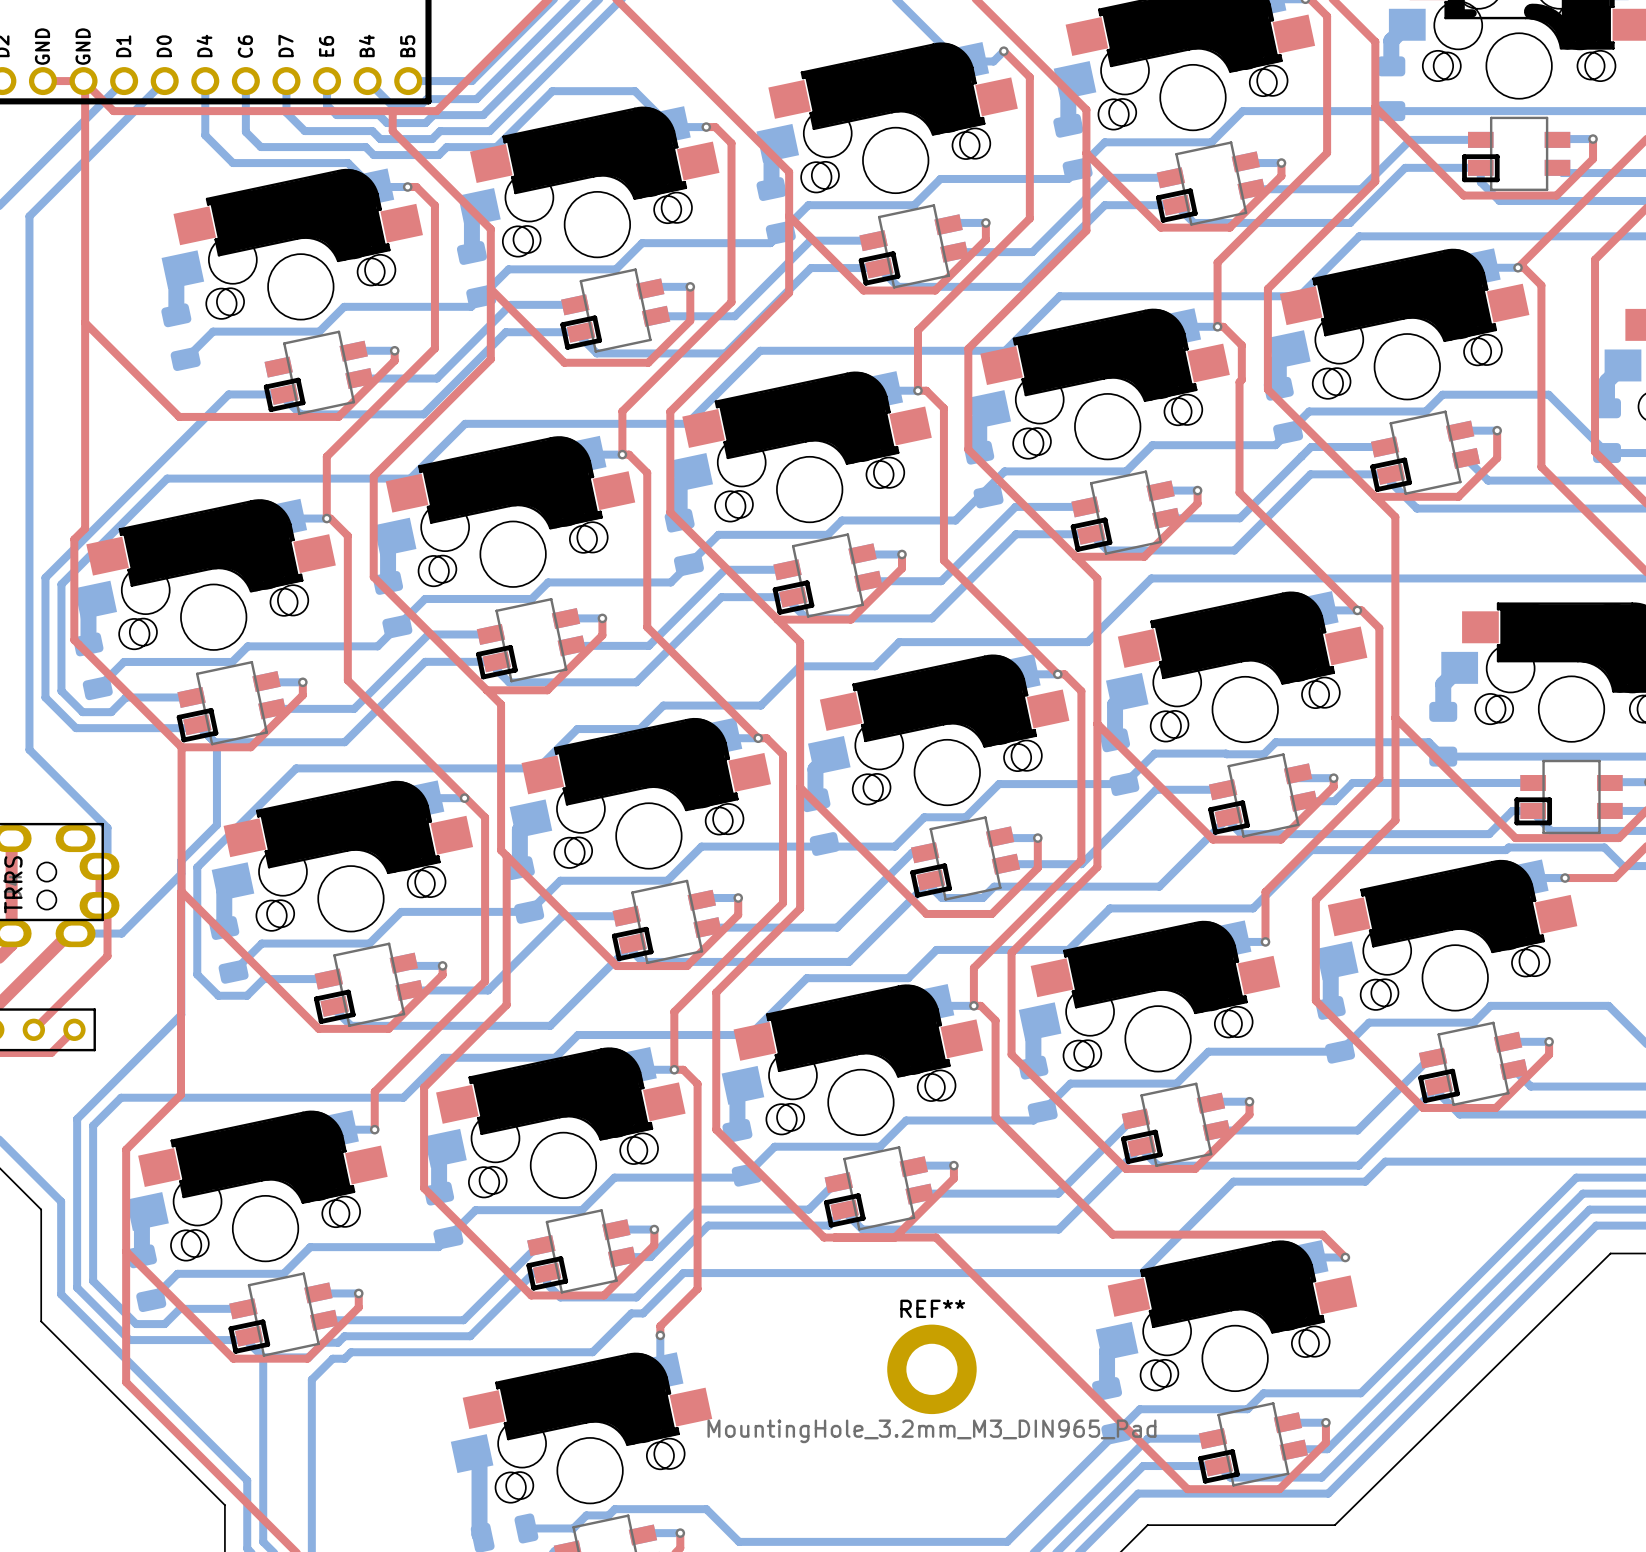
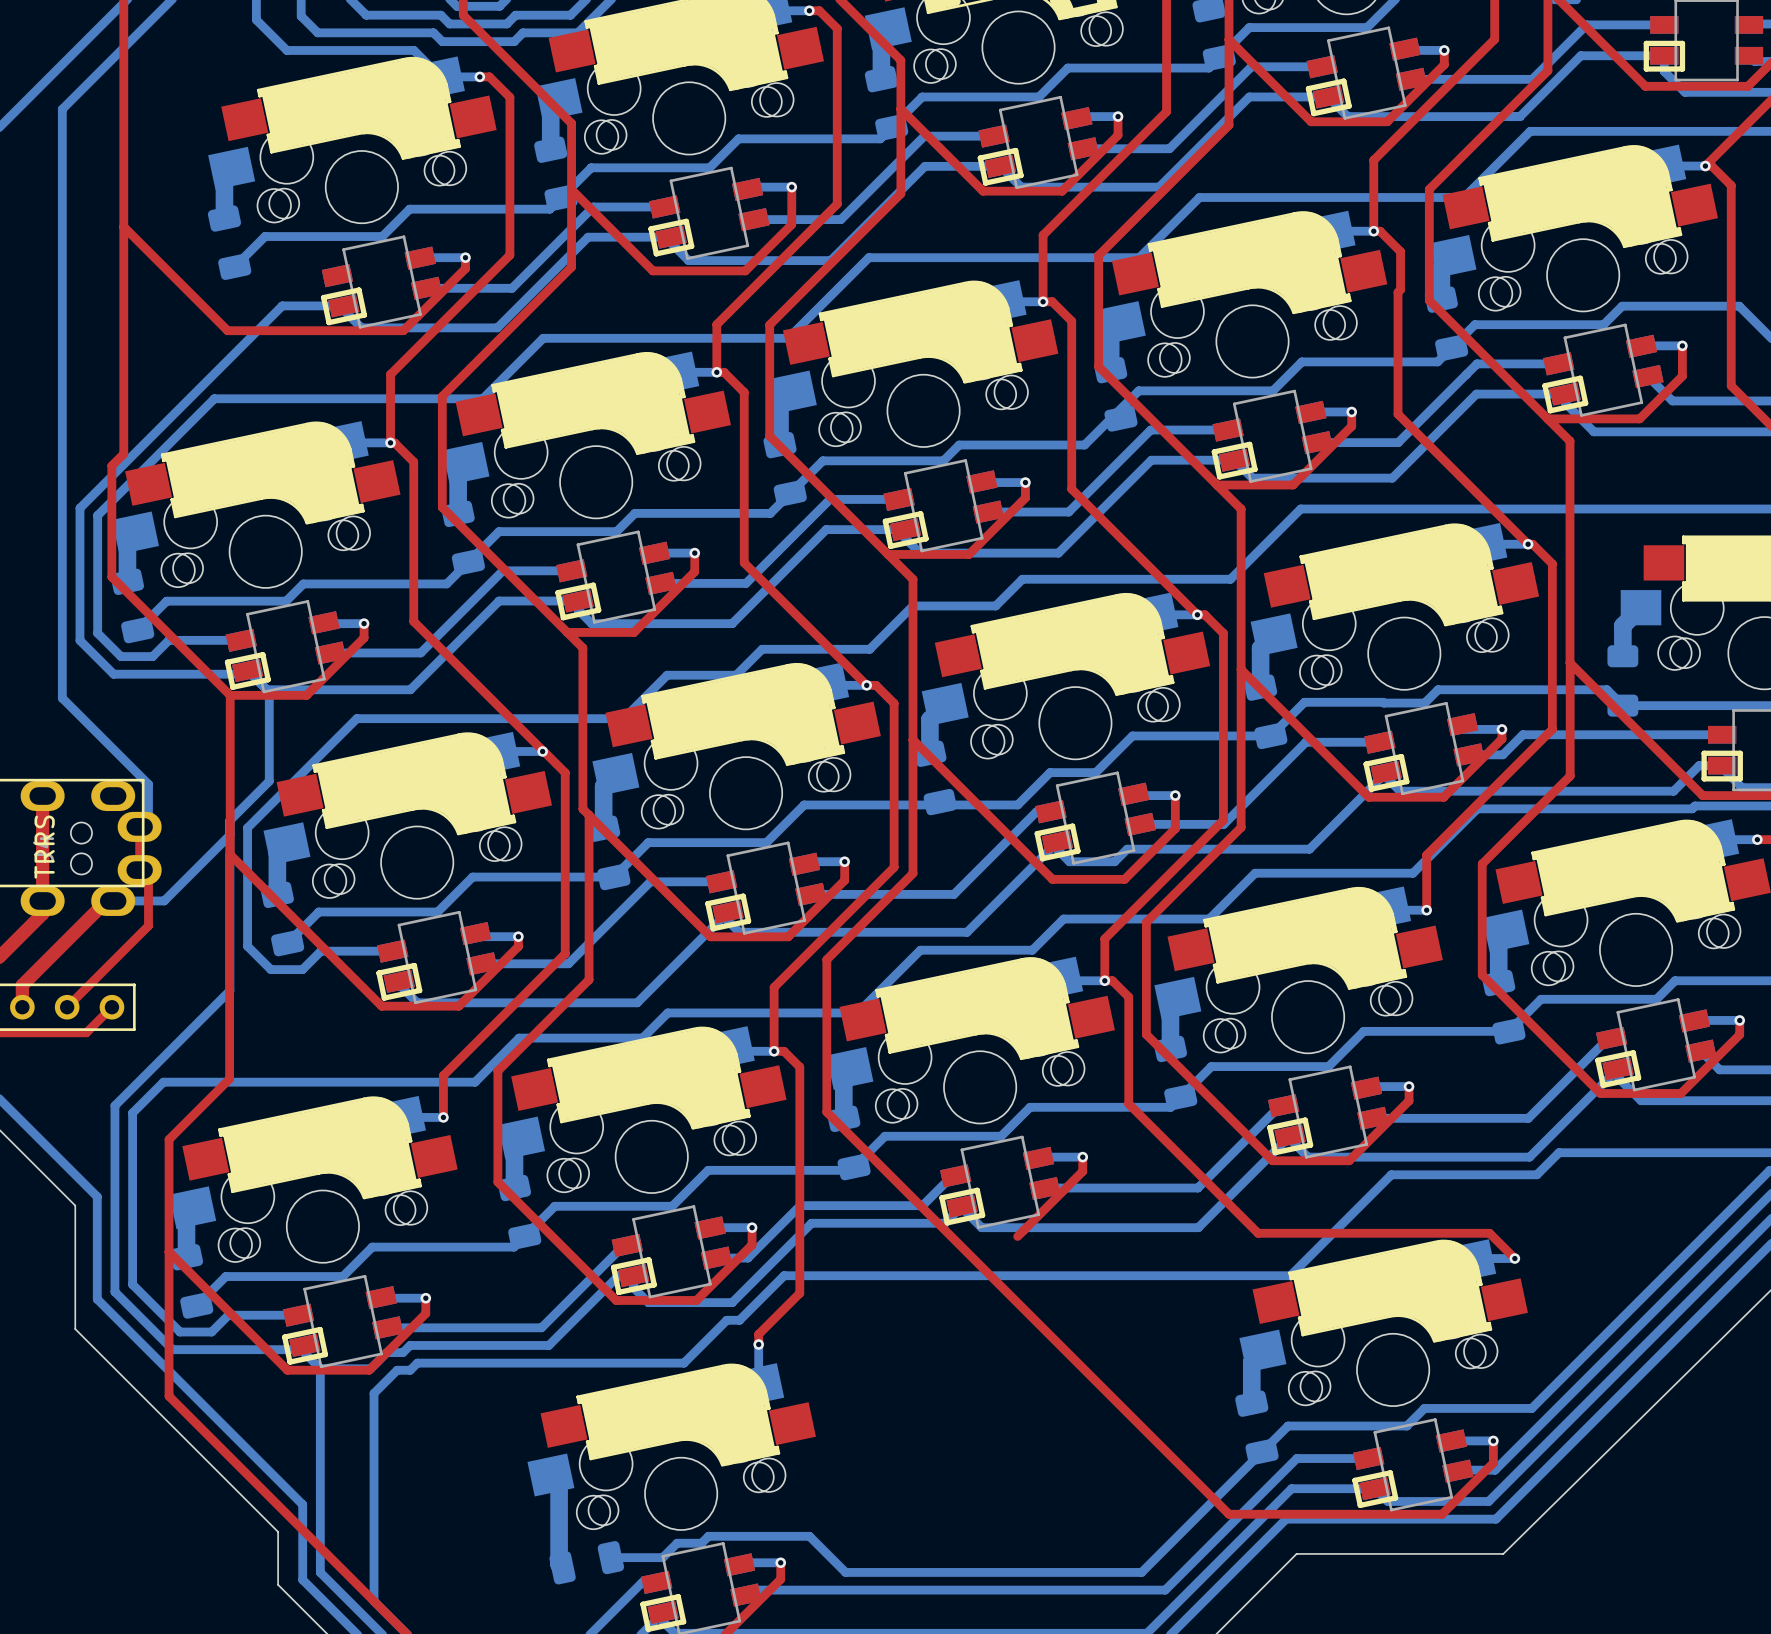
top track: (722, 986) (716, 992) (716, 1129) (824, 1237) (935, 1237) (1187, 1489) -> (826, 959) (826, 1112) (1229, 1514) (1340, 1514)
REF**: MountingHole_3.2mm_M3_DIN965_Pad (931, 1369) -> none

